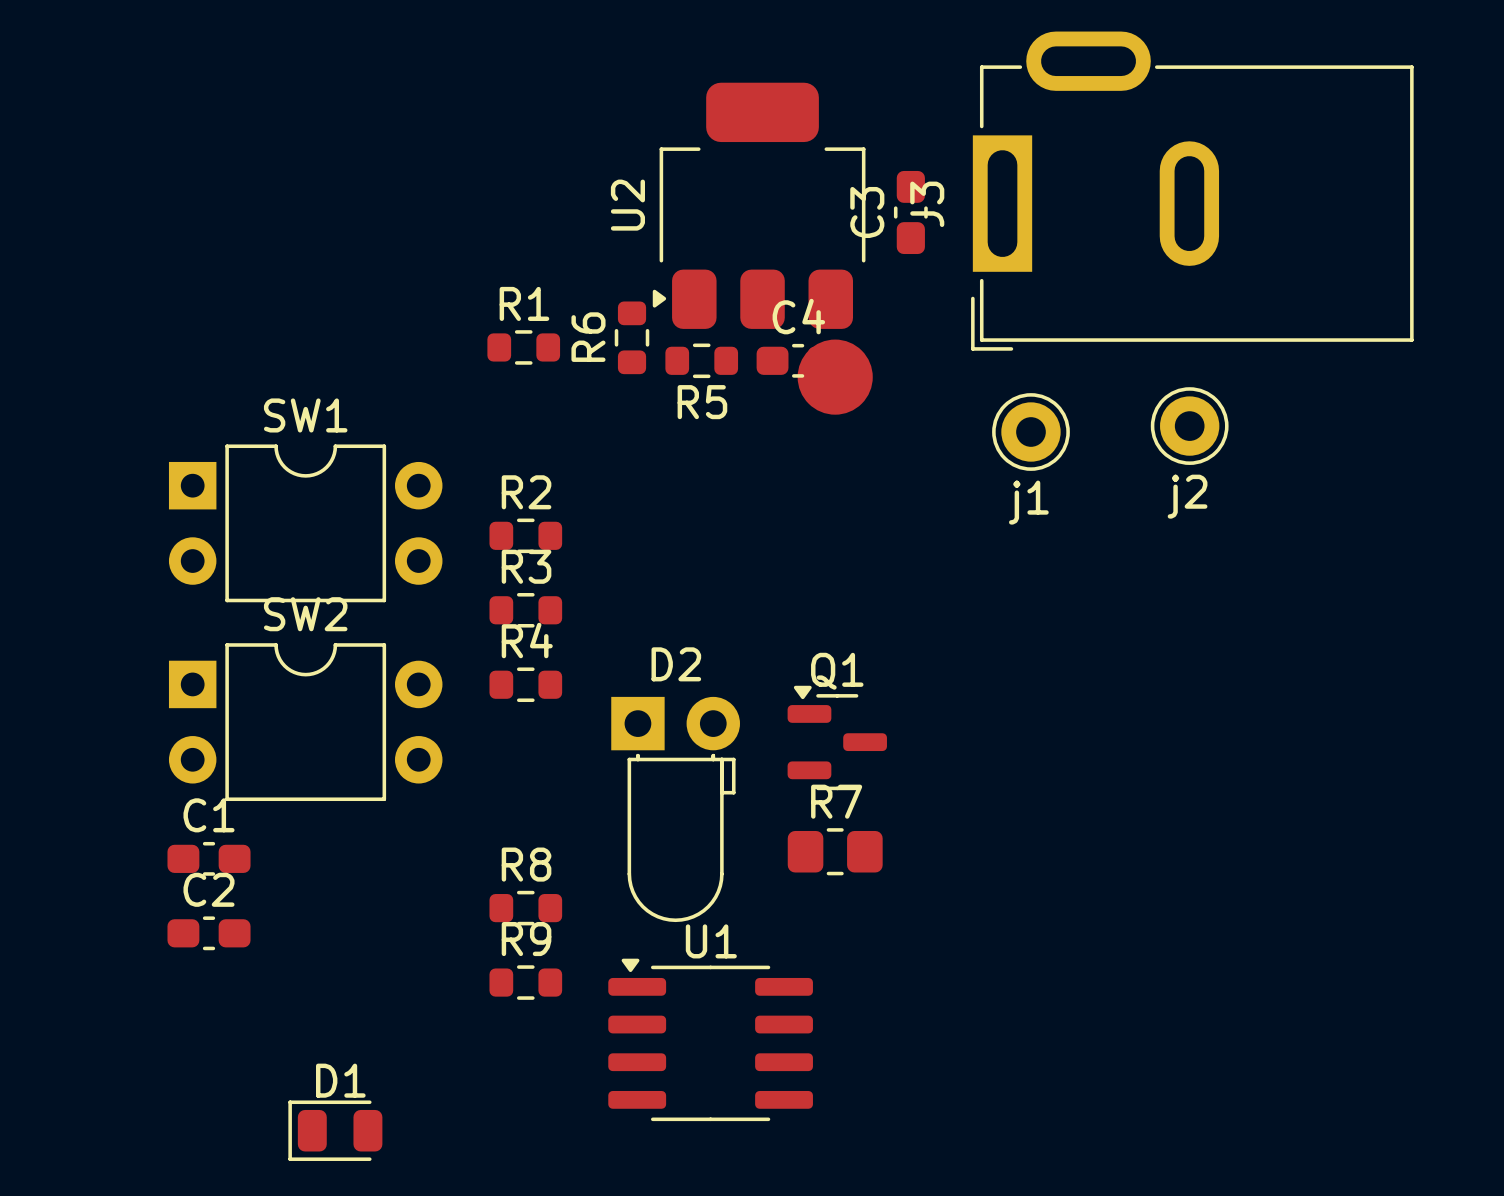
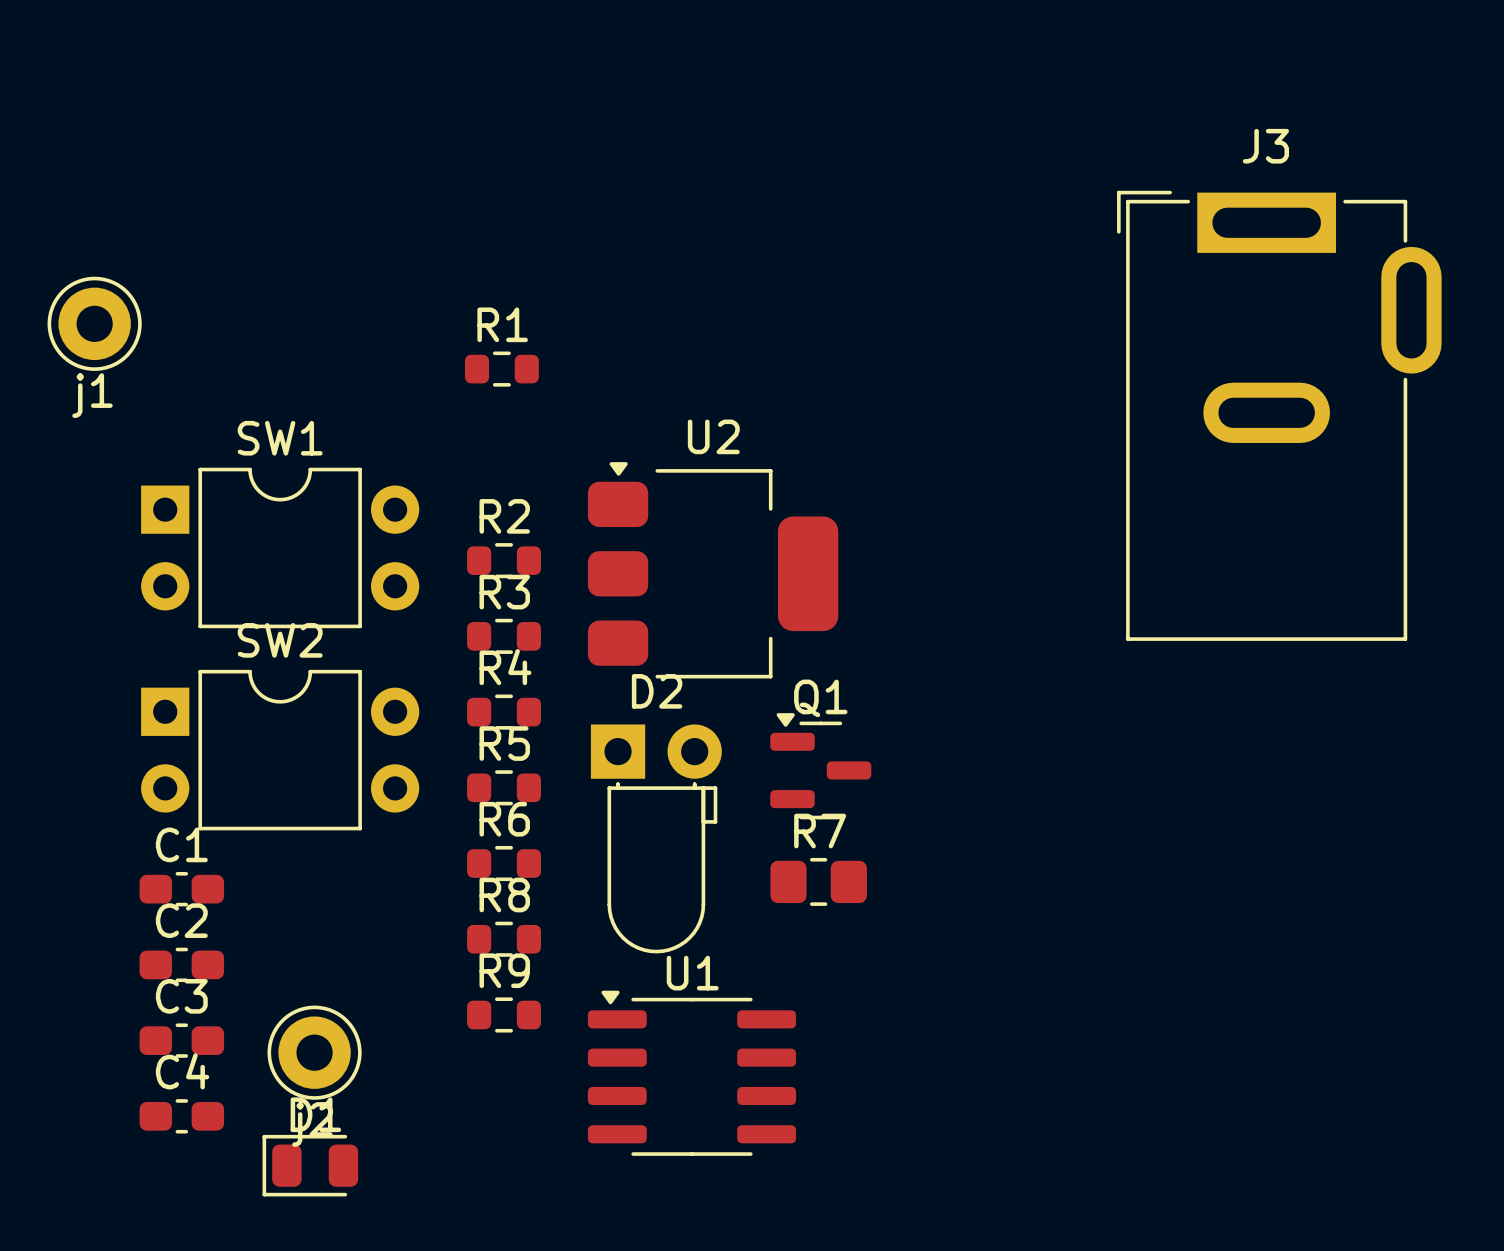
J3 rotation: 0° (1192, 191) -> 90° clockwise (1279, 415)
U2 rotation: 0° (759, 205) -> 90° clockwise (713, 570)
U2 position: (759, 205) -> (713, 570)
C3 rotation: 0° (910, 212) -> 90° clockwise (181, 1040)
C3 position: (910, 212) -> (181, 1040)
R6 rotation: 0° (632, 337) -> 90° clockwise (504, 863)
R6 position: (632, 337) -> (504, 863)
drawing: [797, 339, 873, 415] -> none
R5 position: (701, 360) -> (504, 787)
C4 position: (798, 360) -> (181, 1116)
j2 footprint: [1150, 387, 1229, 465] -> [267, 1005, 362, 1100]
j1 footprint: [992, 393, 1070, 471] -> [47, 276, 142, 371]
R5 name position: R5 (702, 402) -> R5 (504, 743)

